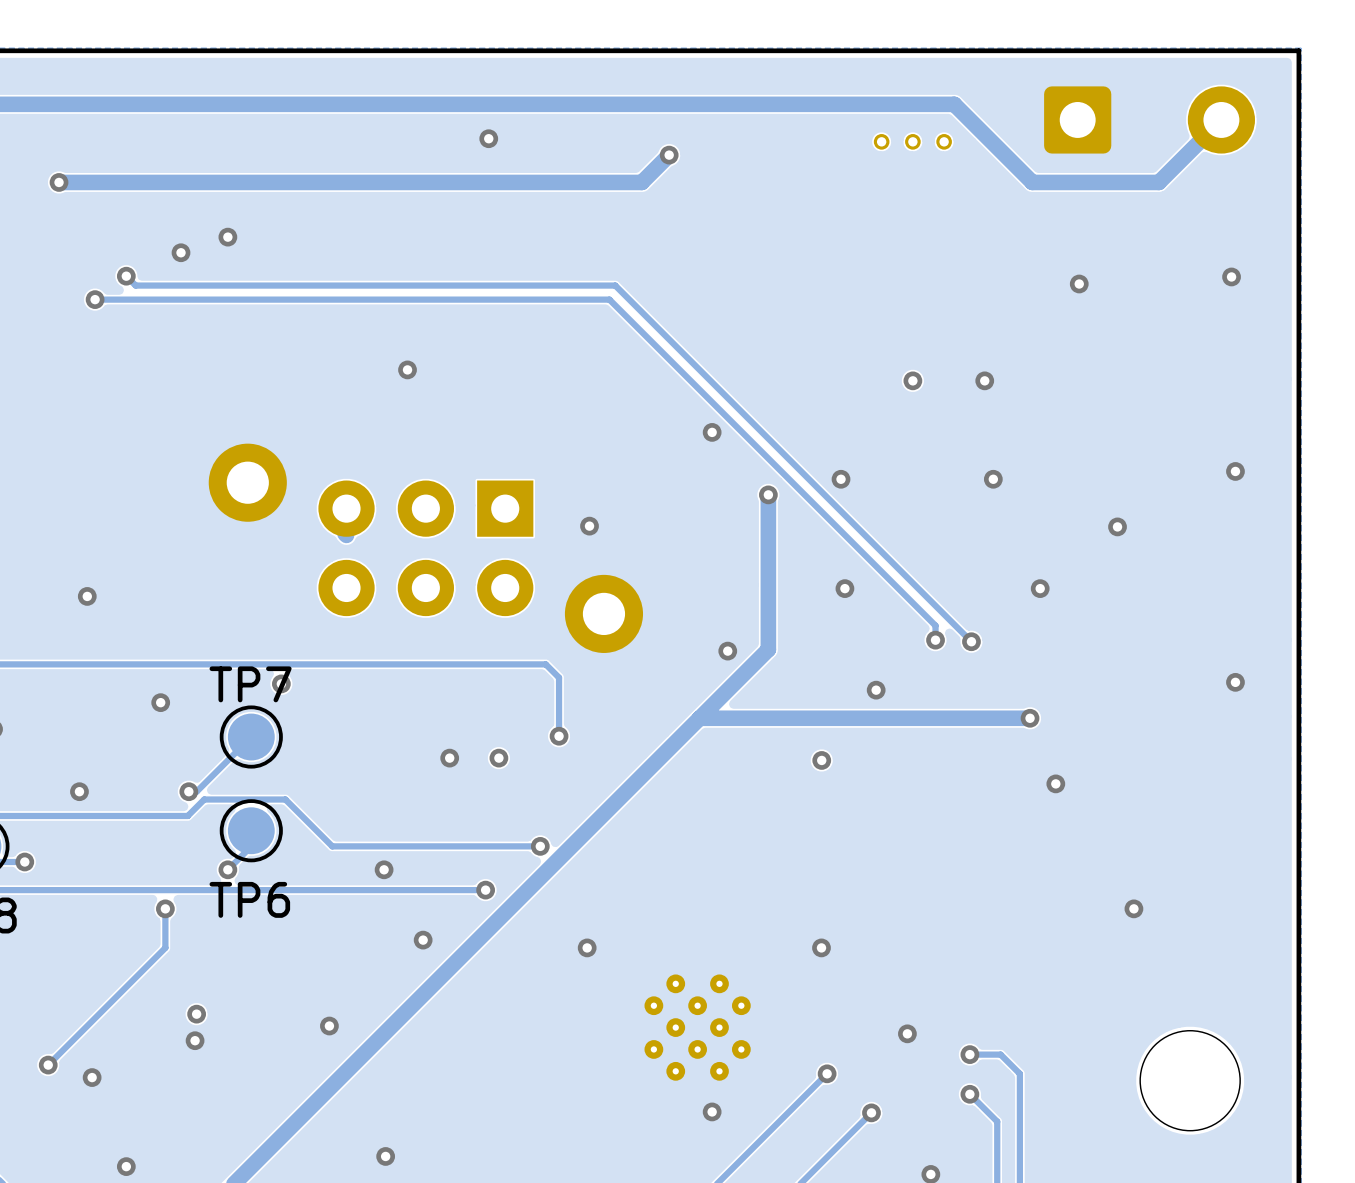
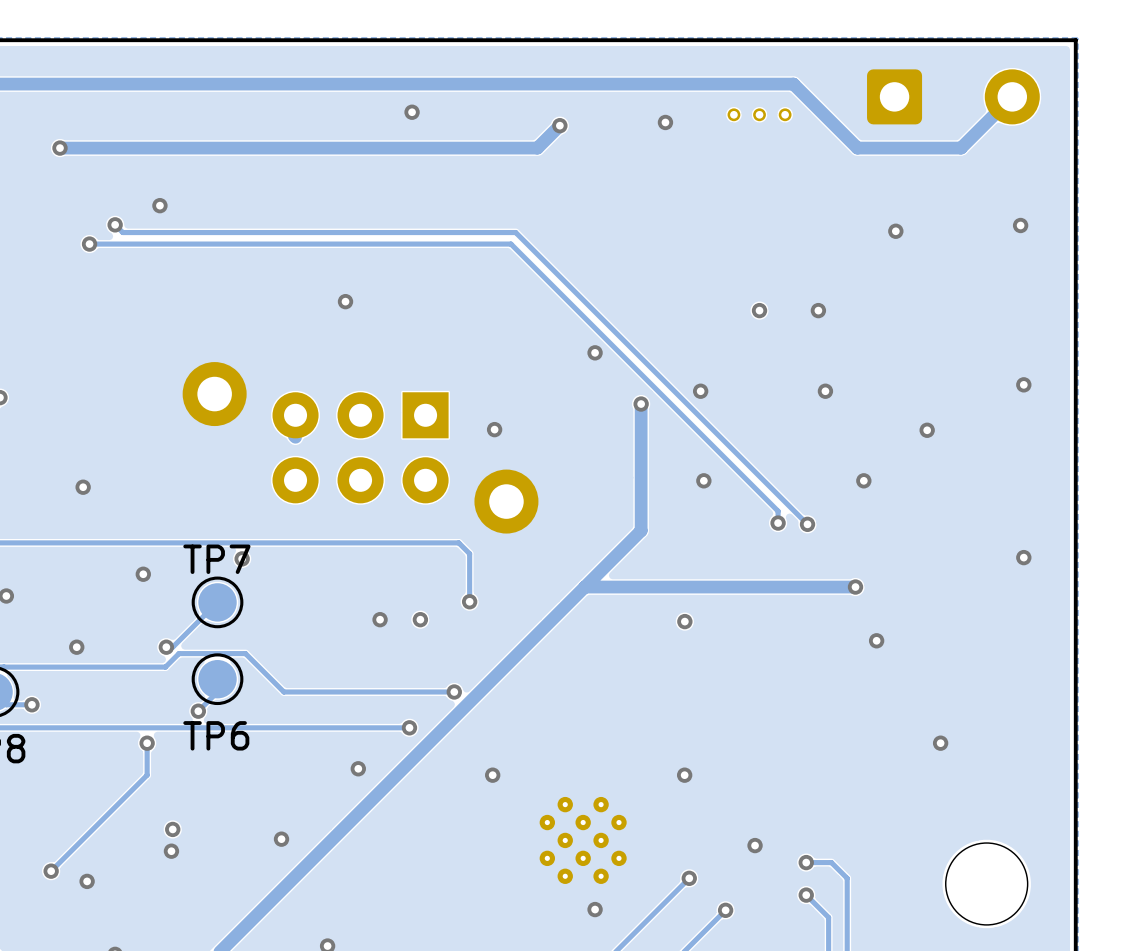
via: none -> (665, 122)
via: (227, 237) -> none
via: (727, 651) -> none
via: (876, 690) -> none
via: (384, 869) -> none

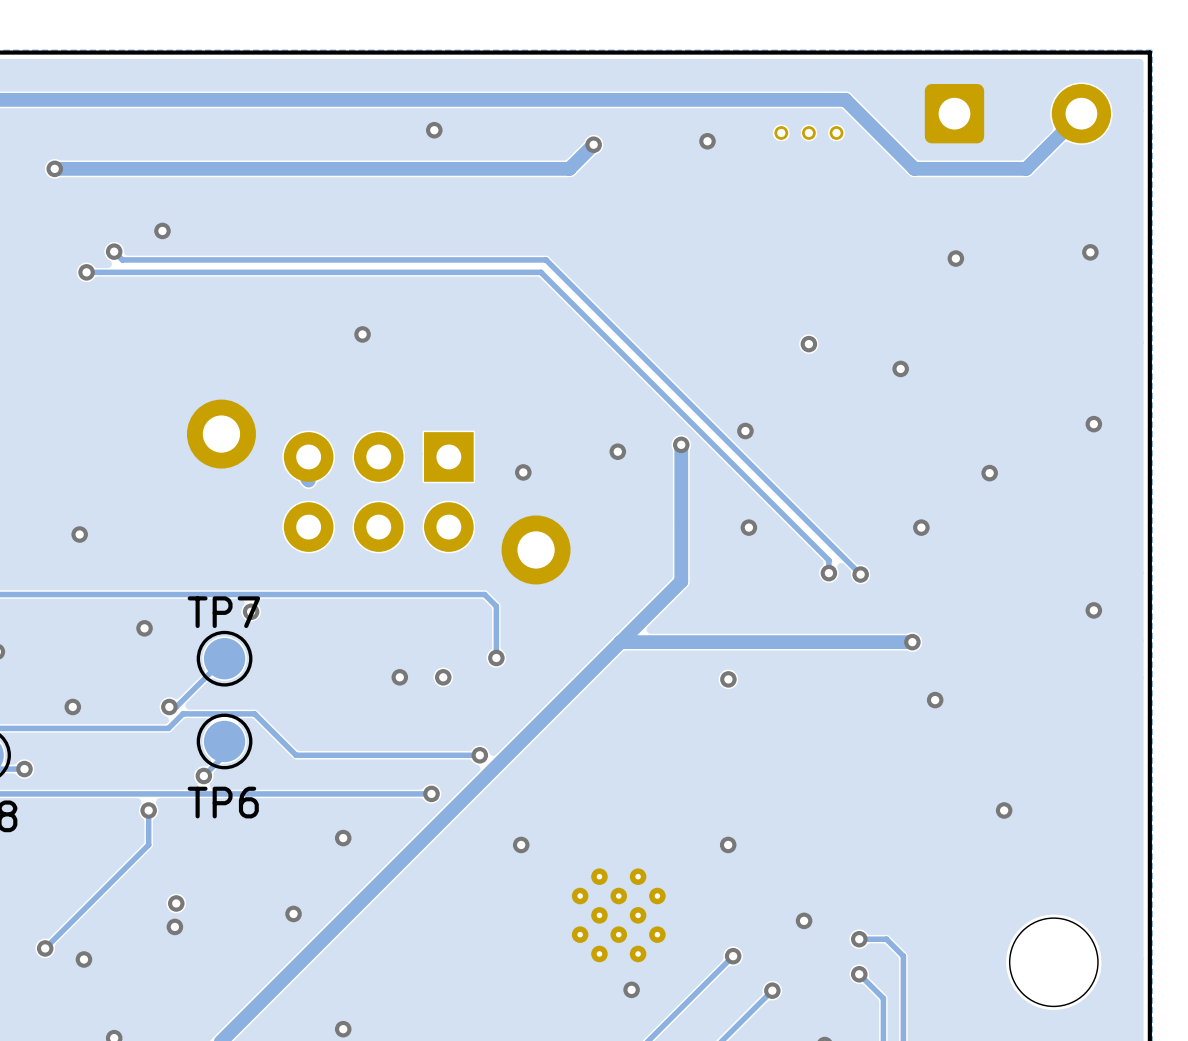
via: (818, 310) -> none
via: none -> (900, 368)
via position: (595, 352) -> (617, 451)
via: (825, 391) -> none
via position: (358, 768) -> (343, 838)

